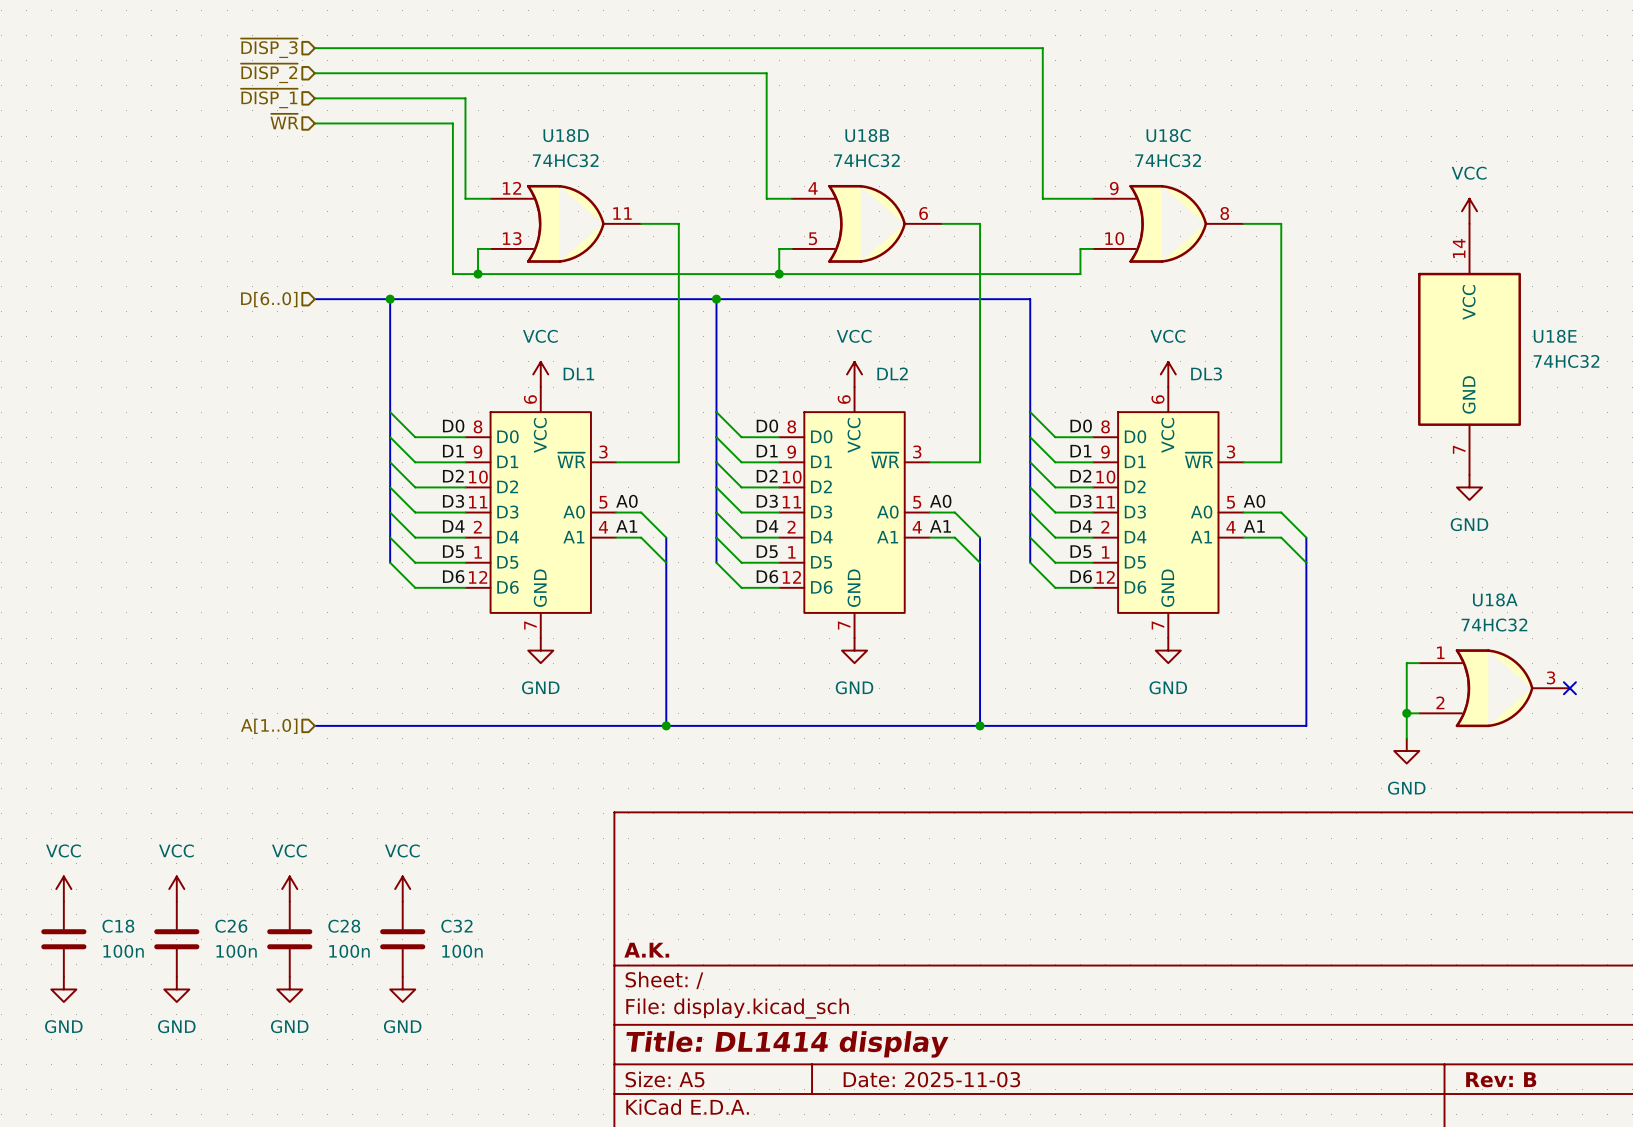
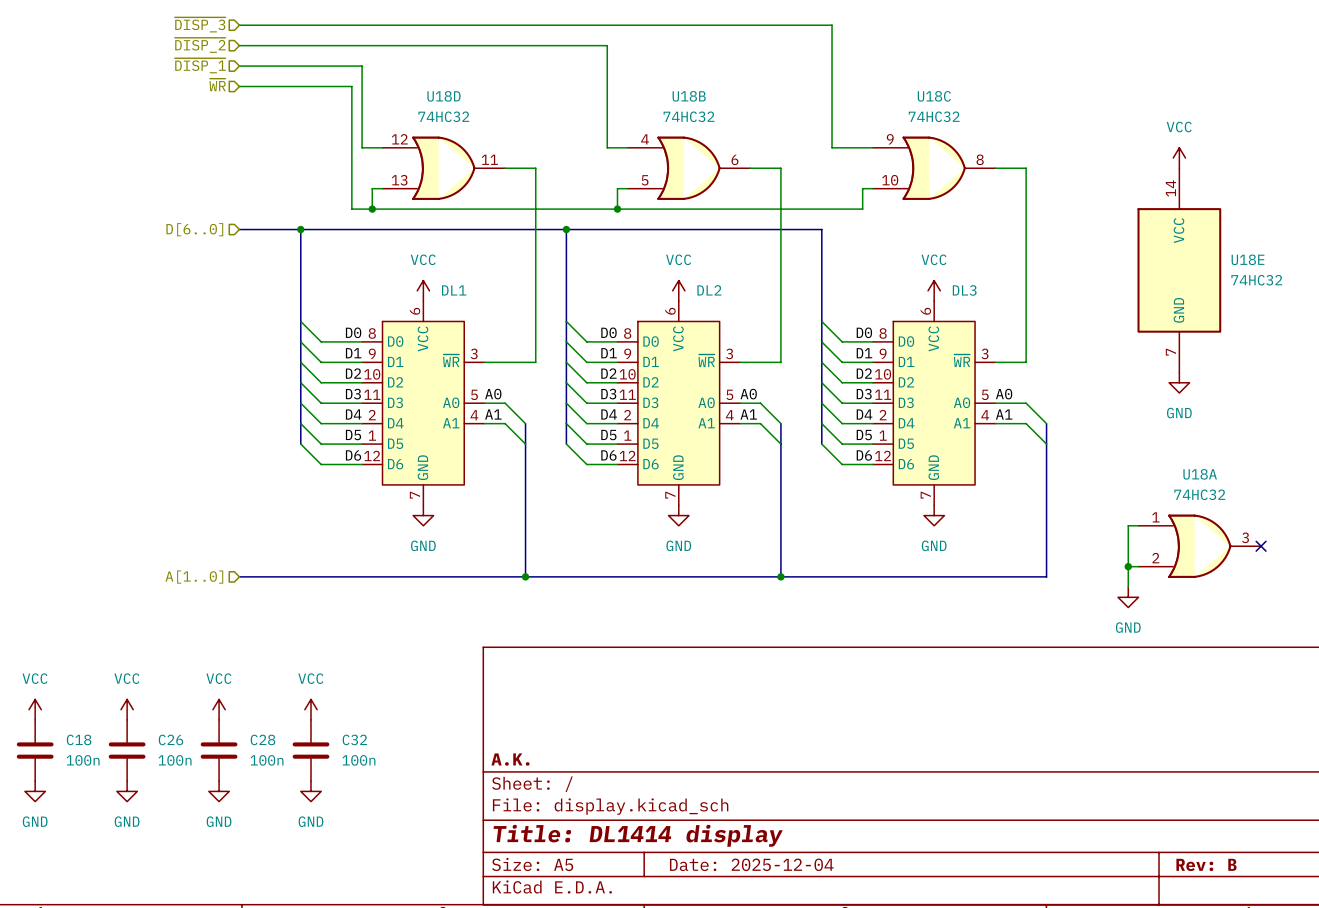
title block: Date: 2025-11-03 (931, 1079) -> Date: 2025-12-04 (751, 864)

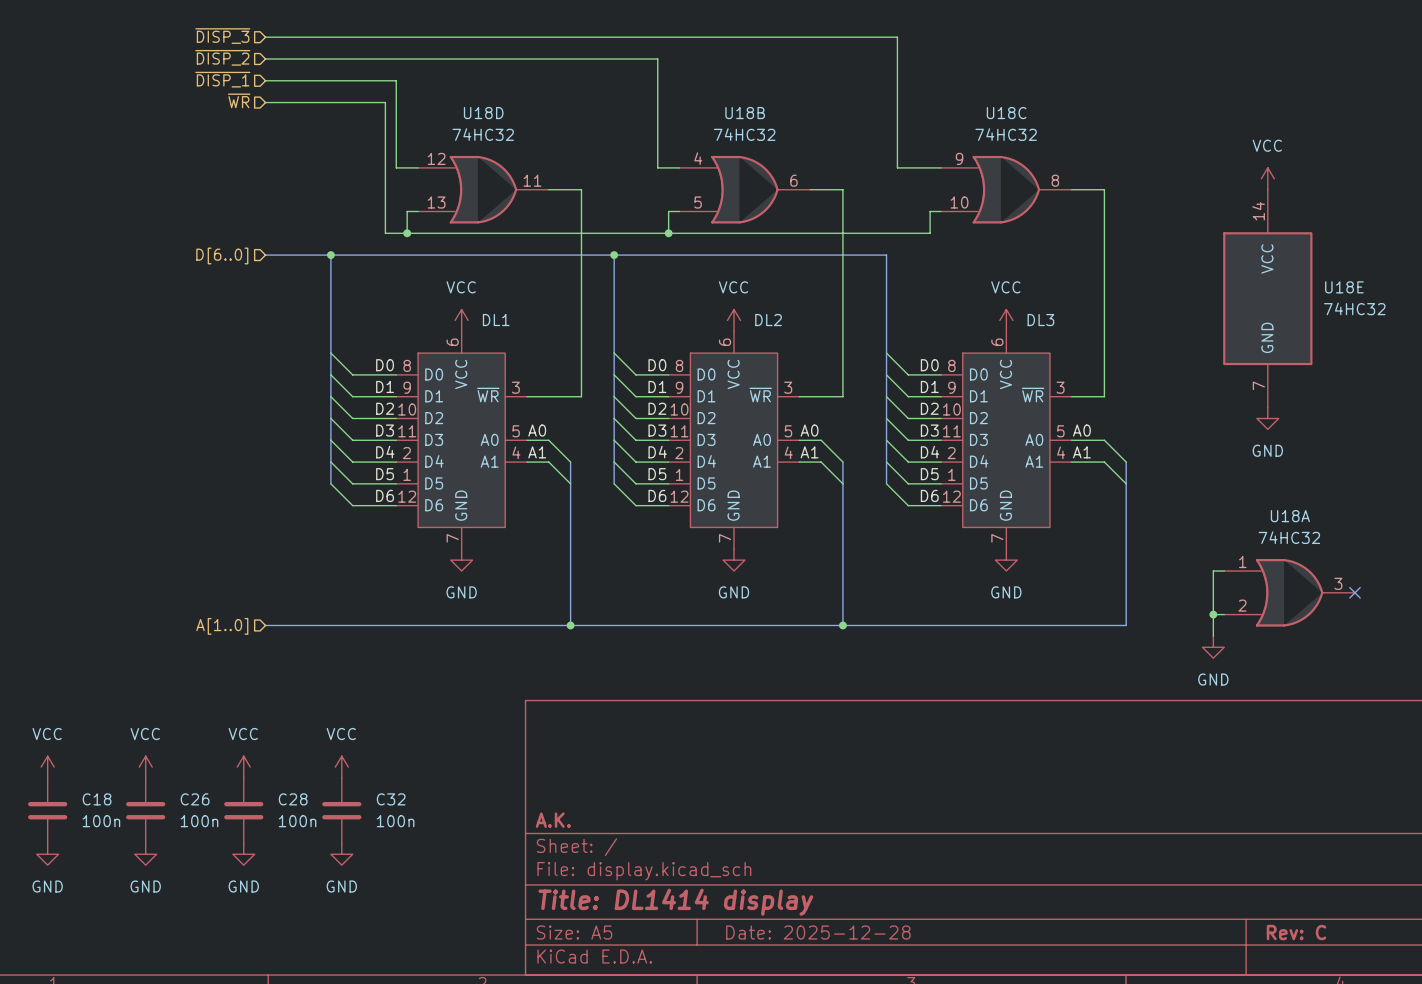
title block: Date: 2025-12-04 (751, 864) -> Date: 2025-12-28 (818, 932)
title block: Rev: B (1206, 864) -> Rev: C (1296, 932)

